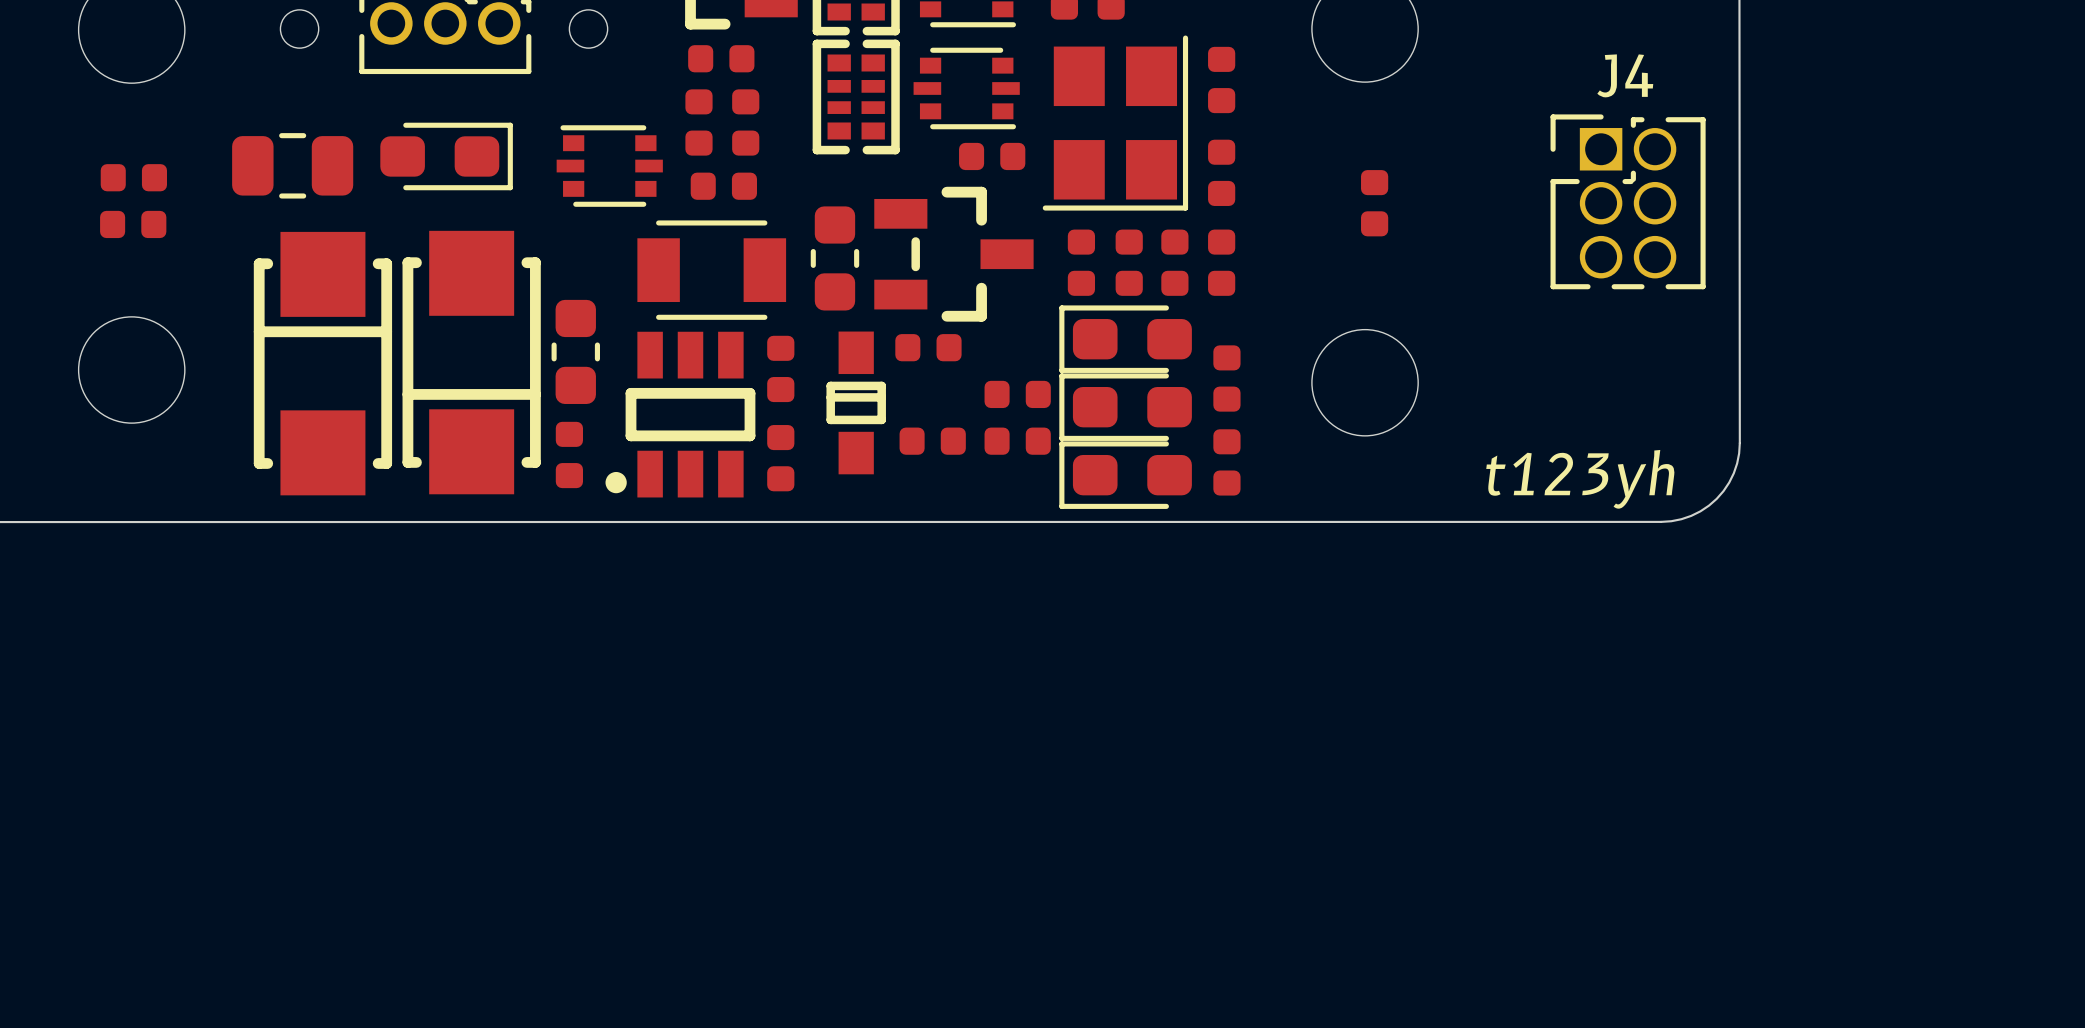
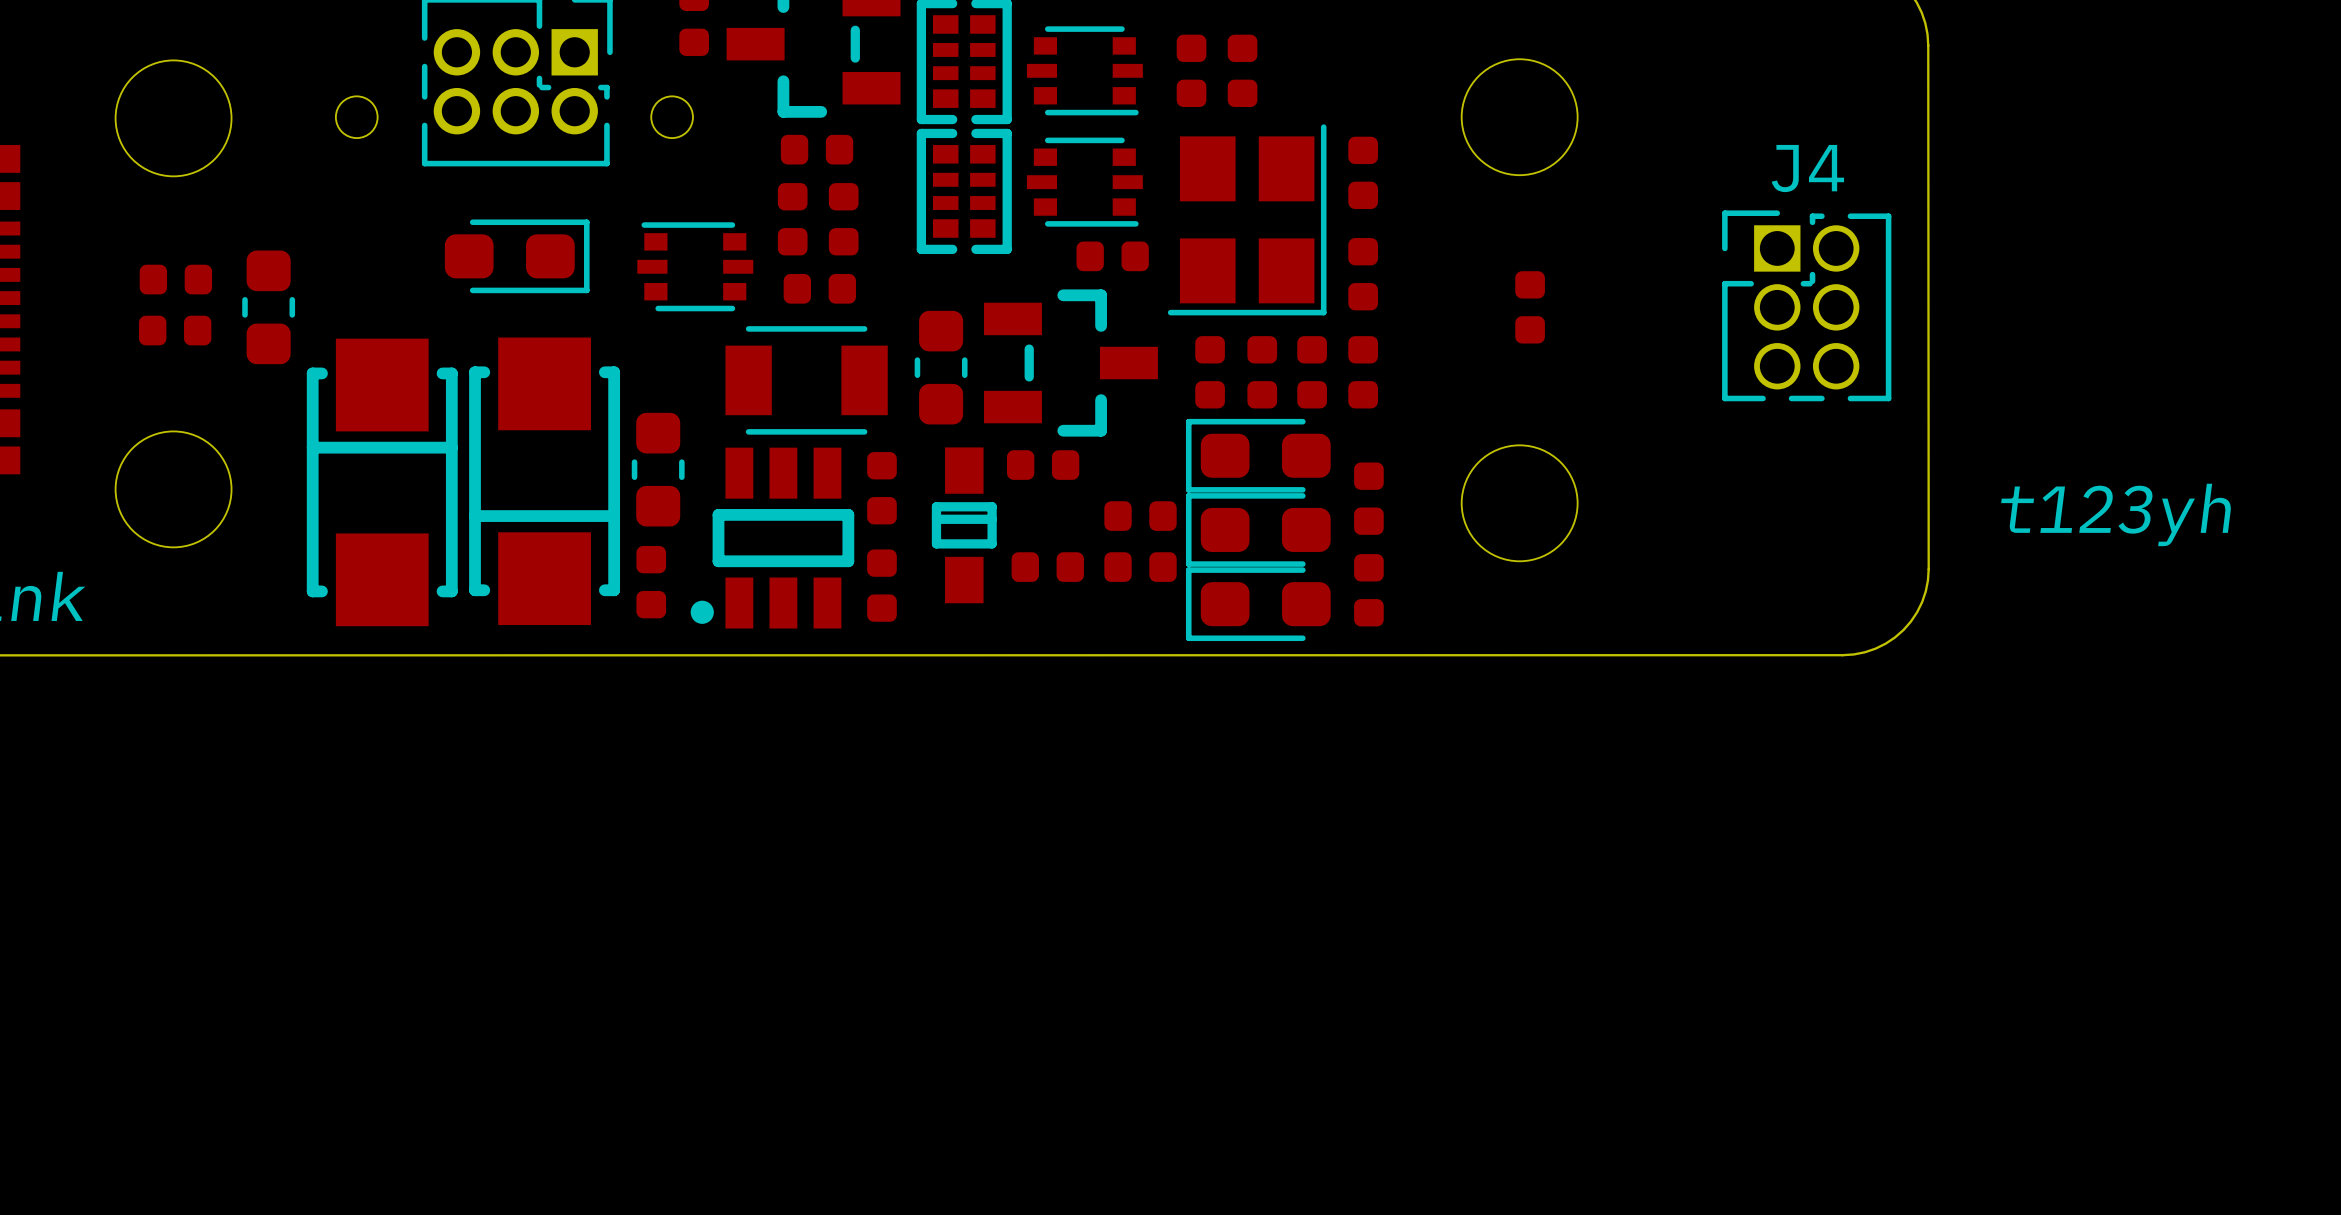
part: (292, 165) -> none
part: none -> (268, 307)
text position: t123yh (1580, 479) -> t123yh (2116, 514)

